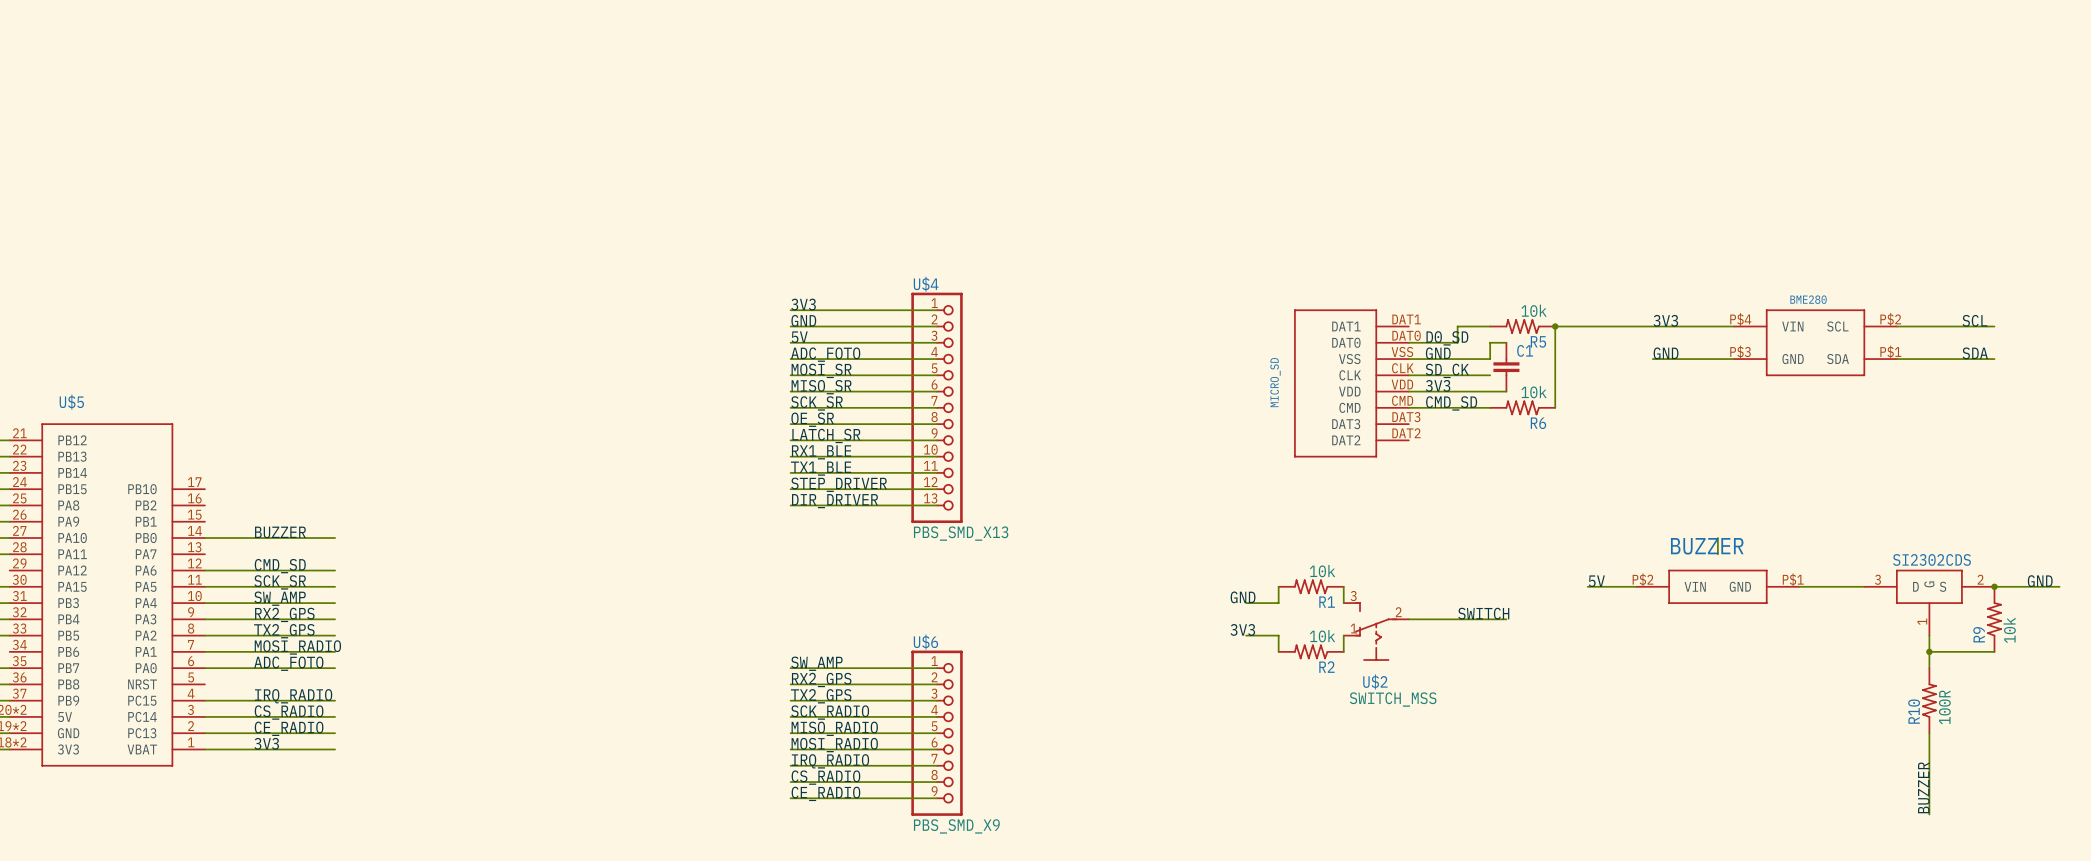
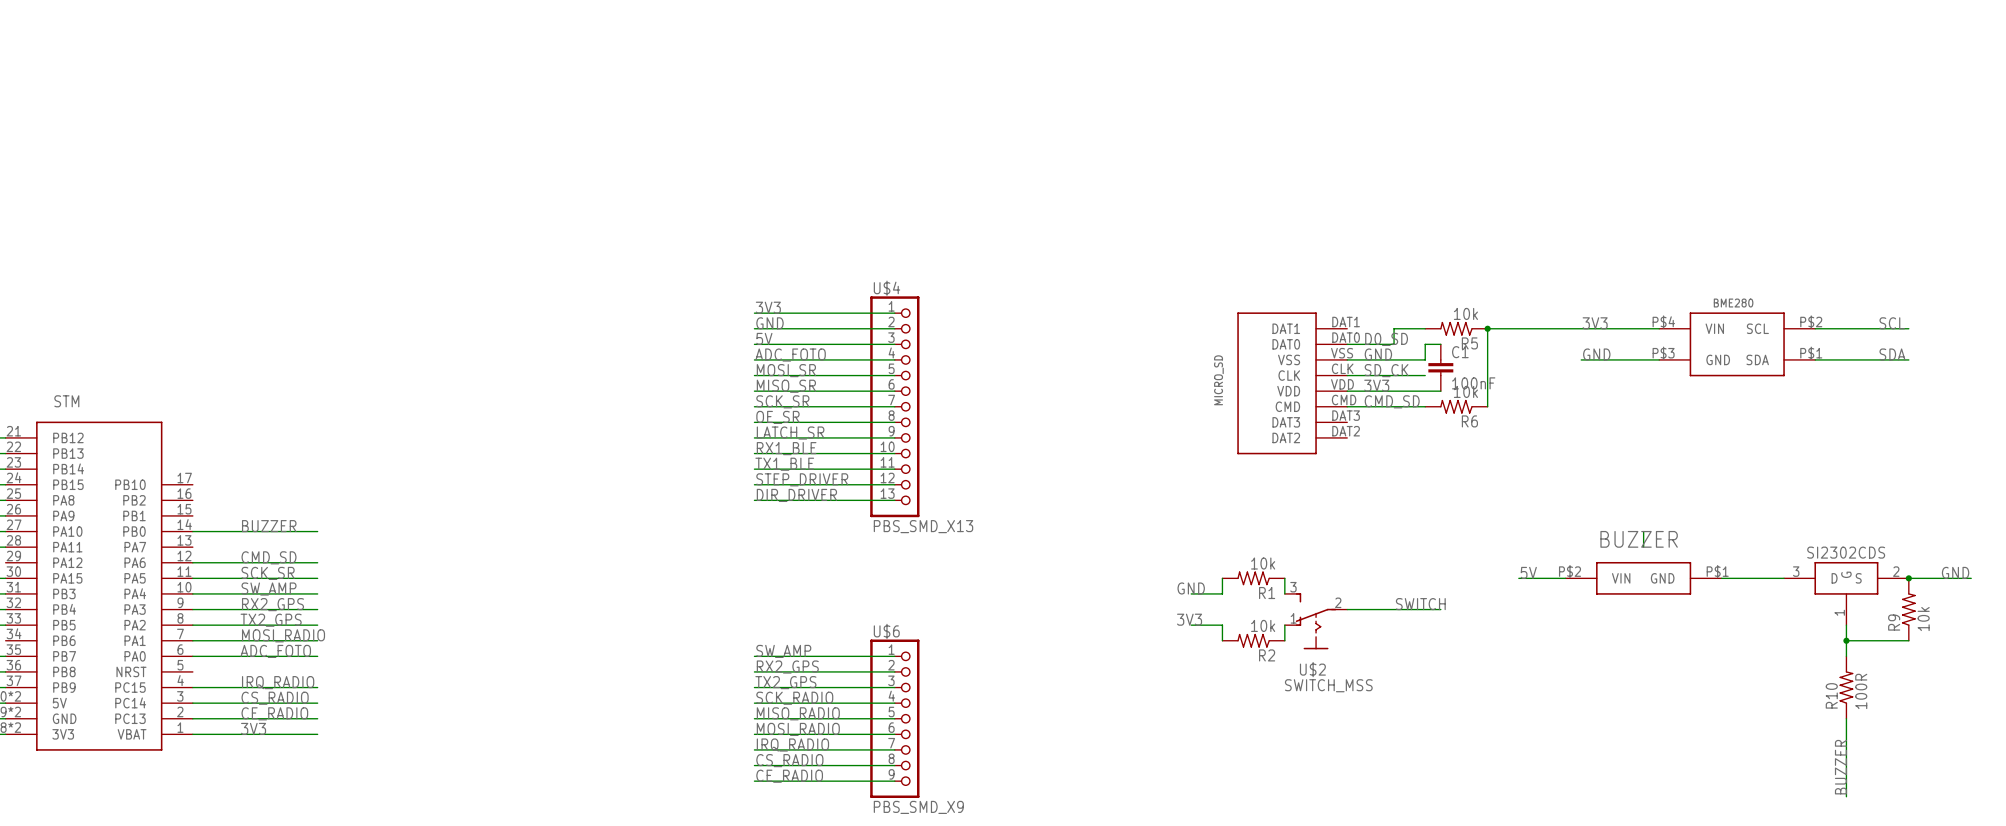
C1 value: none -> 100nF (1473, 383)
U$5 name: U$5 (71, 402) -> STM (66, 401)

